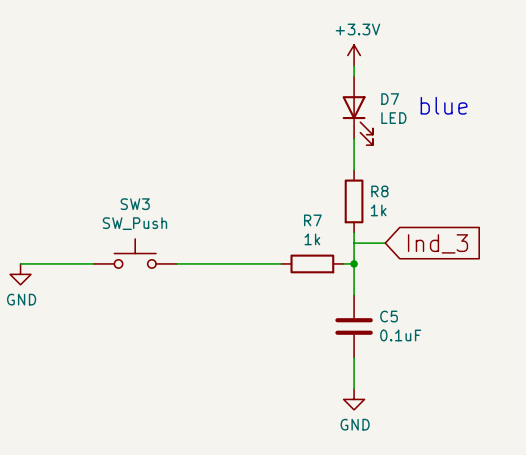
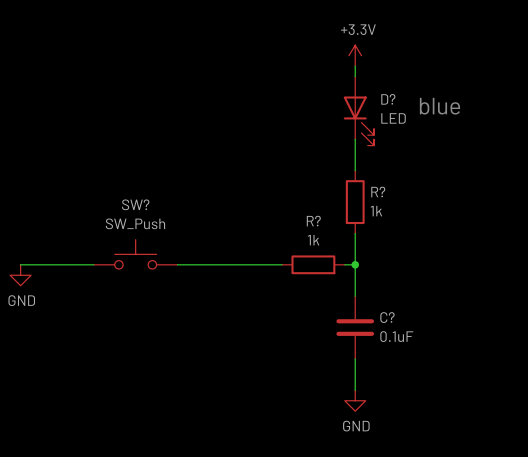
D7 name: D7 (390, 99) -> D? (388, 99)
R8 name: R8 (379, 191) -> R? (378, 192)
SW3 name: SW3 (135, 204) -> SW? (135, 204)
R7 name: R7 (312, 220) -> R? (313, 221)
wire: (354, 243) (385, 243) -> none
global label: Ind_3 (438, 243) -> none
C5 name: C5 (389, 316) -> C? (387, 317)

